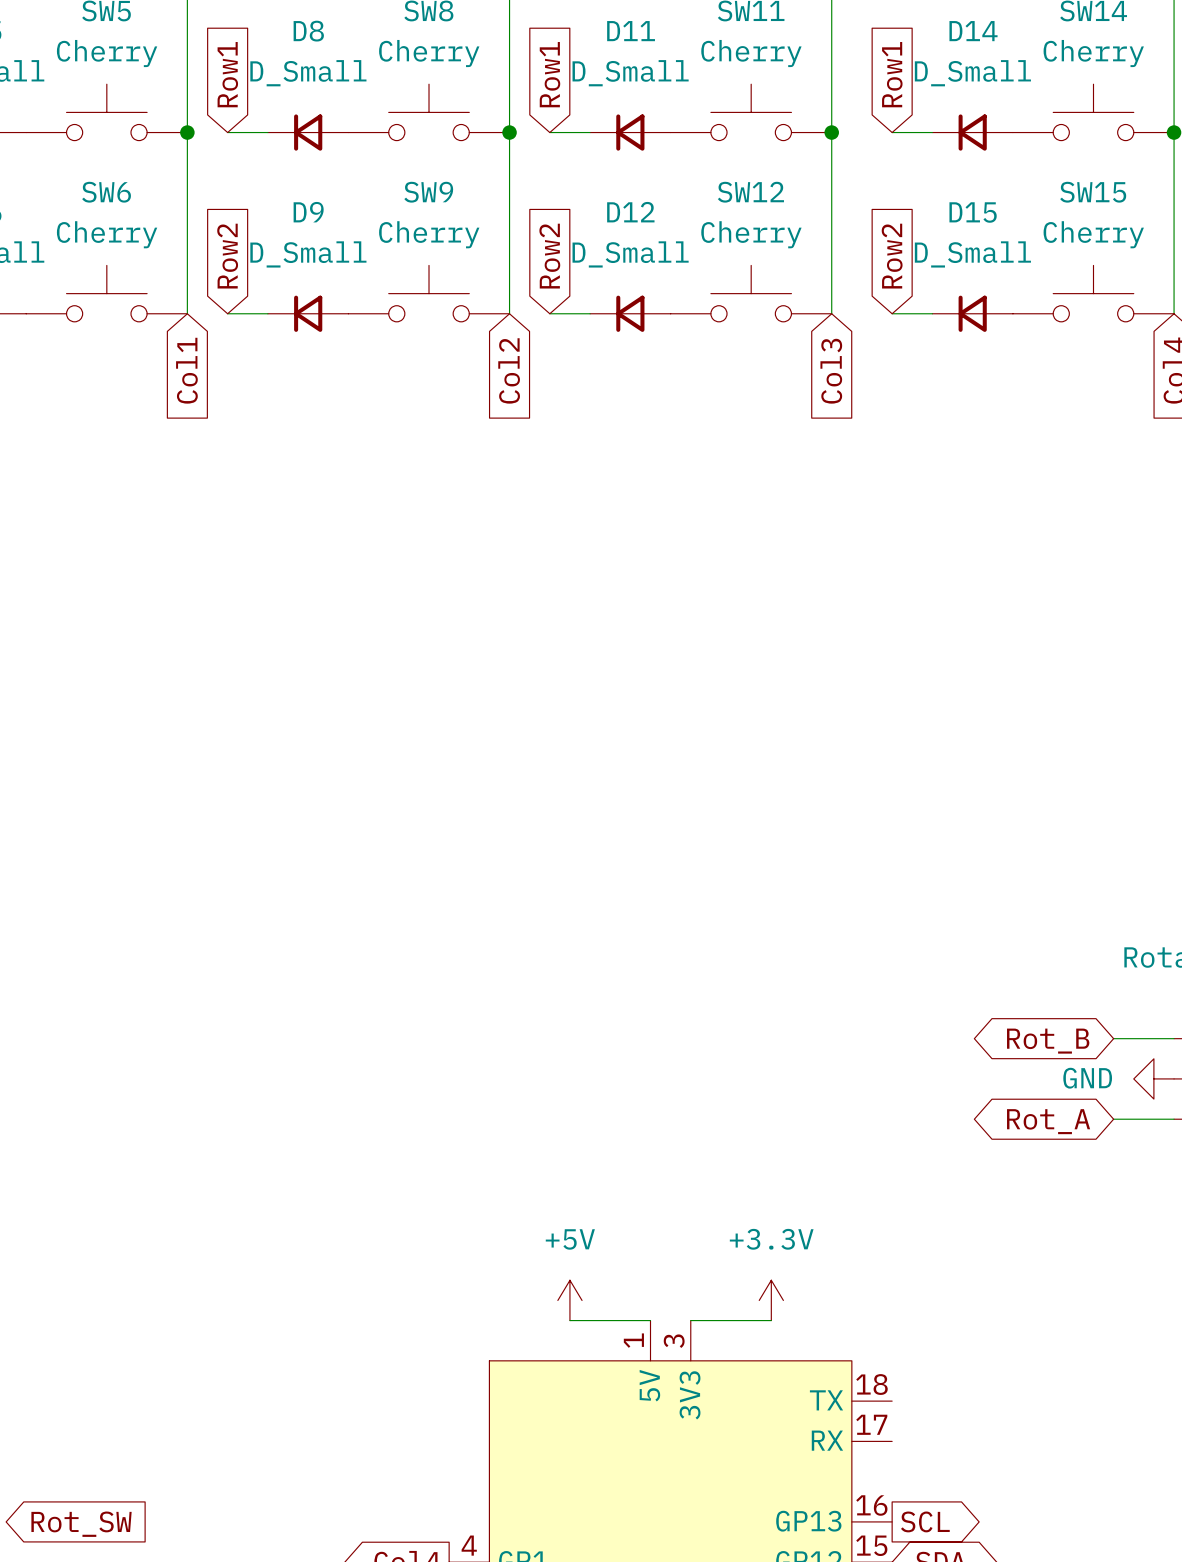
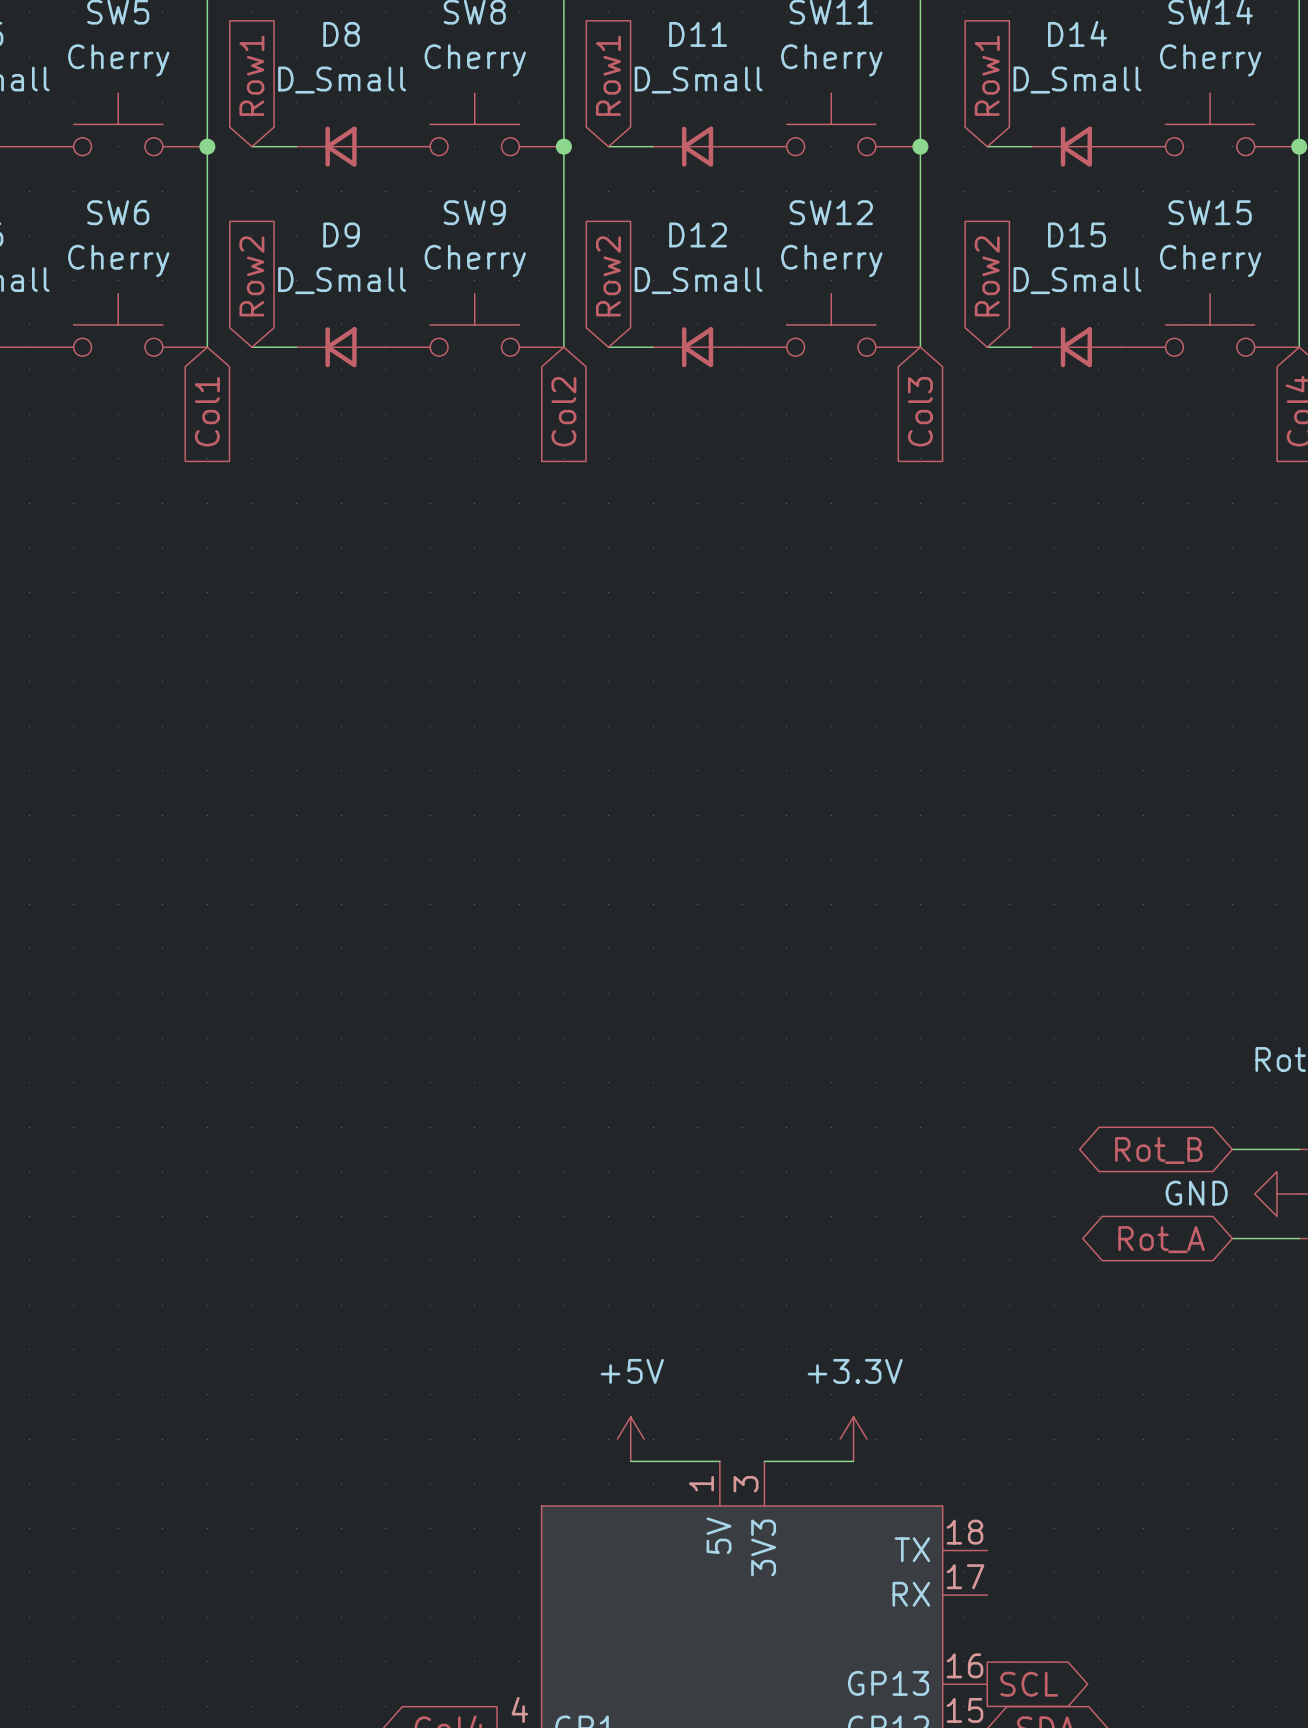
global label: Rot_SW (81, 1524) -> none

